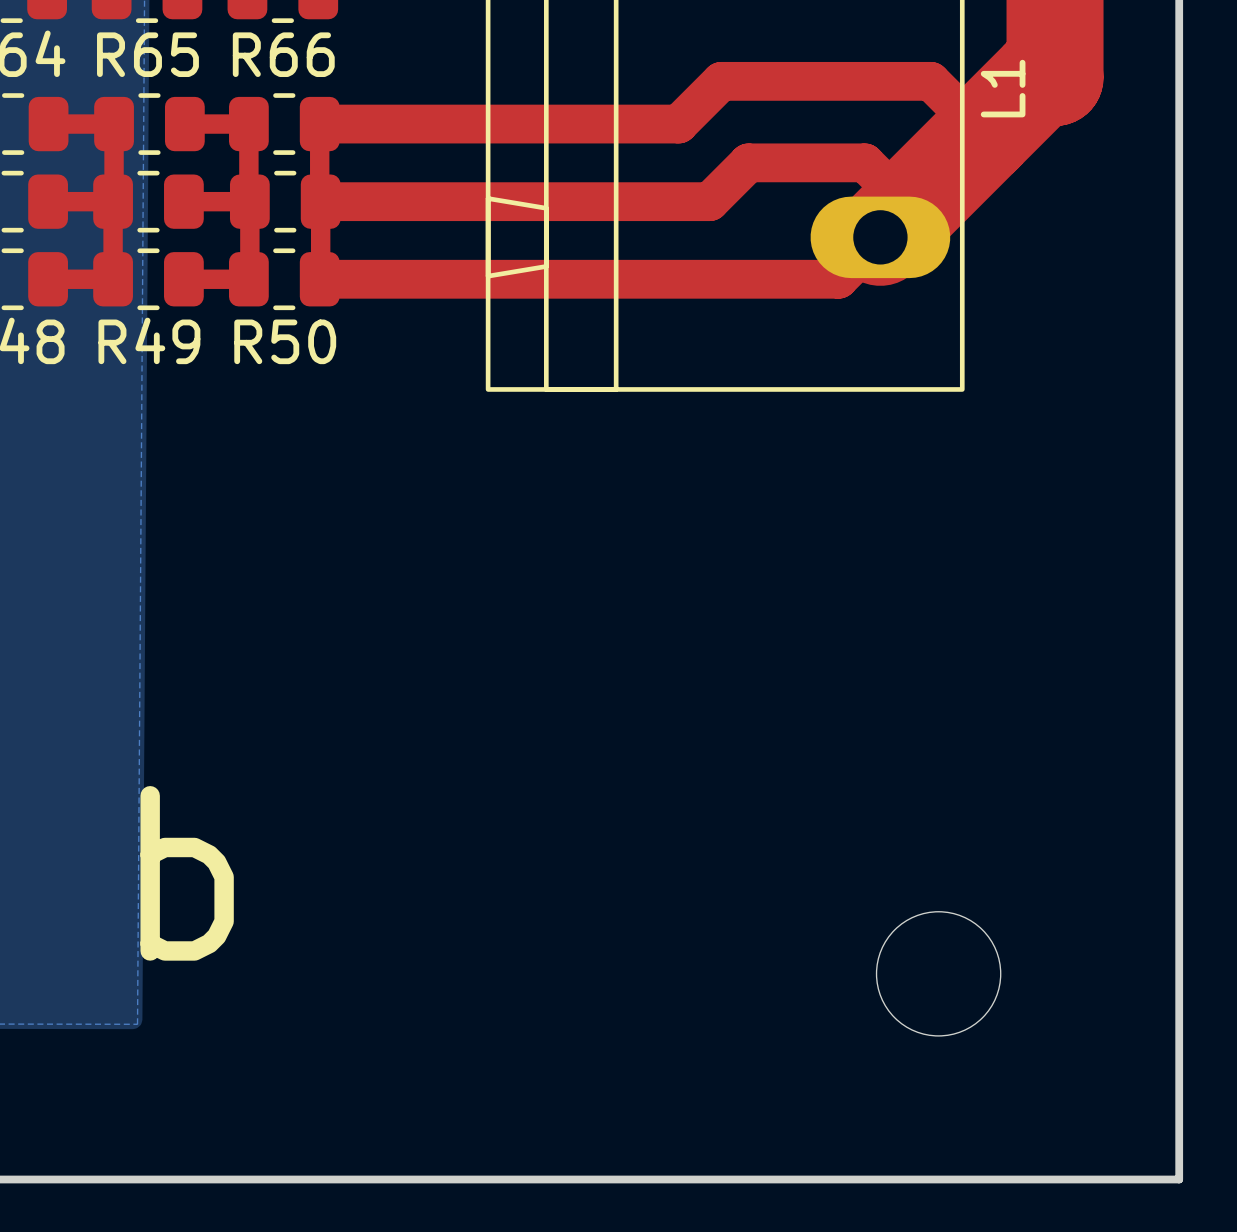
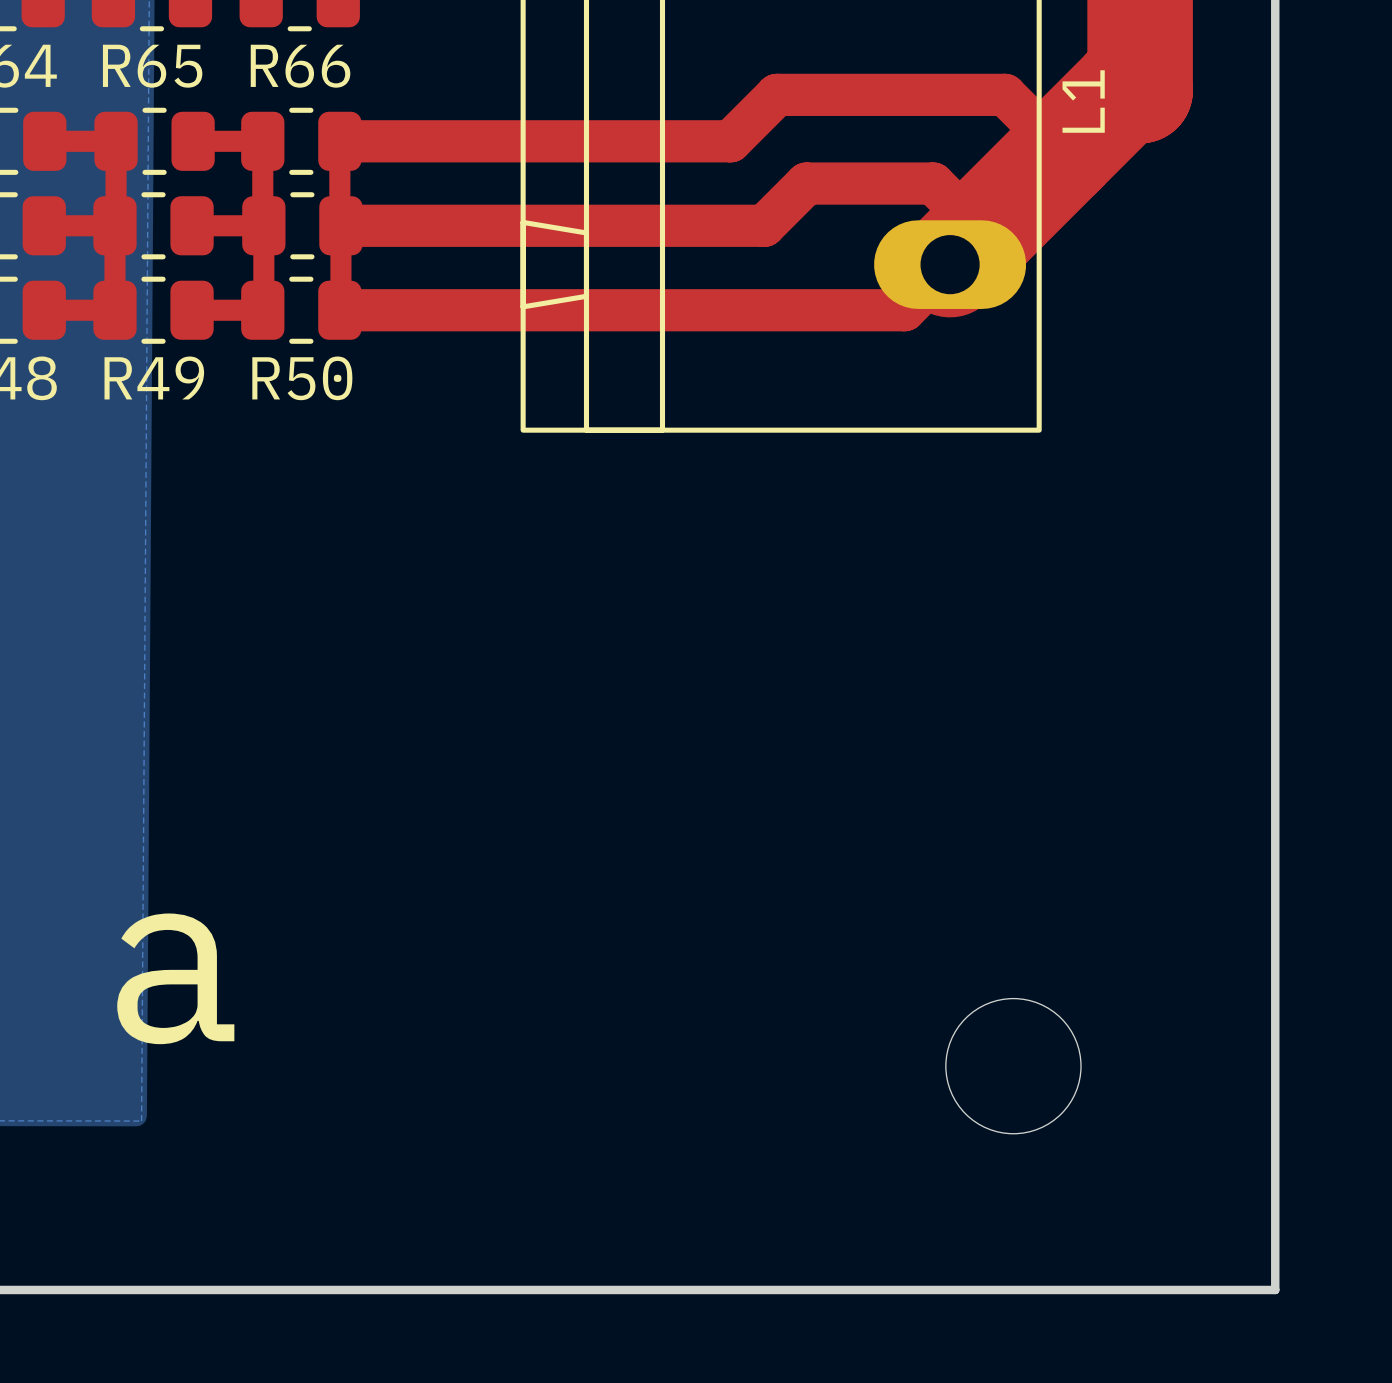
text: b (187, 873) -> a (175, 978)

